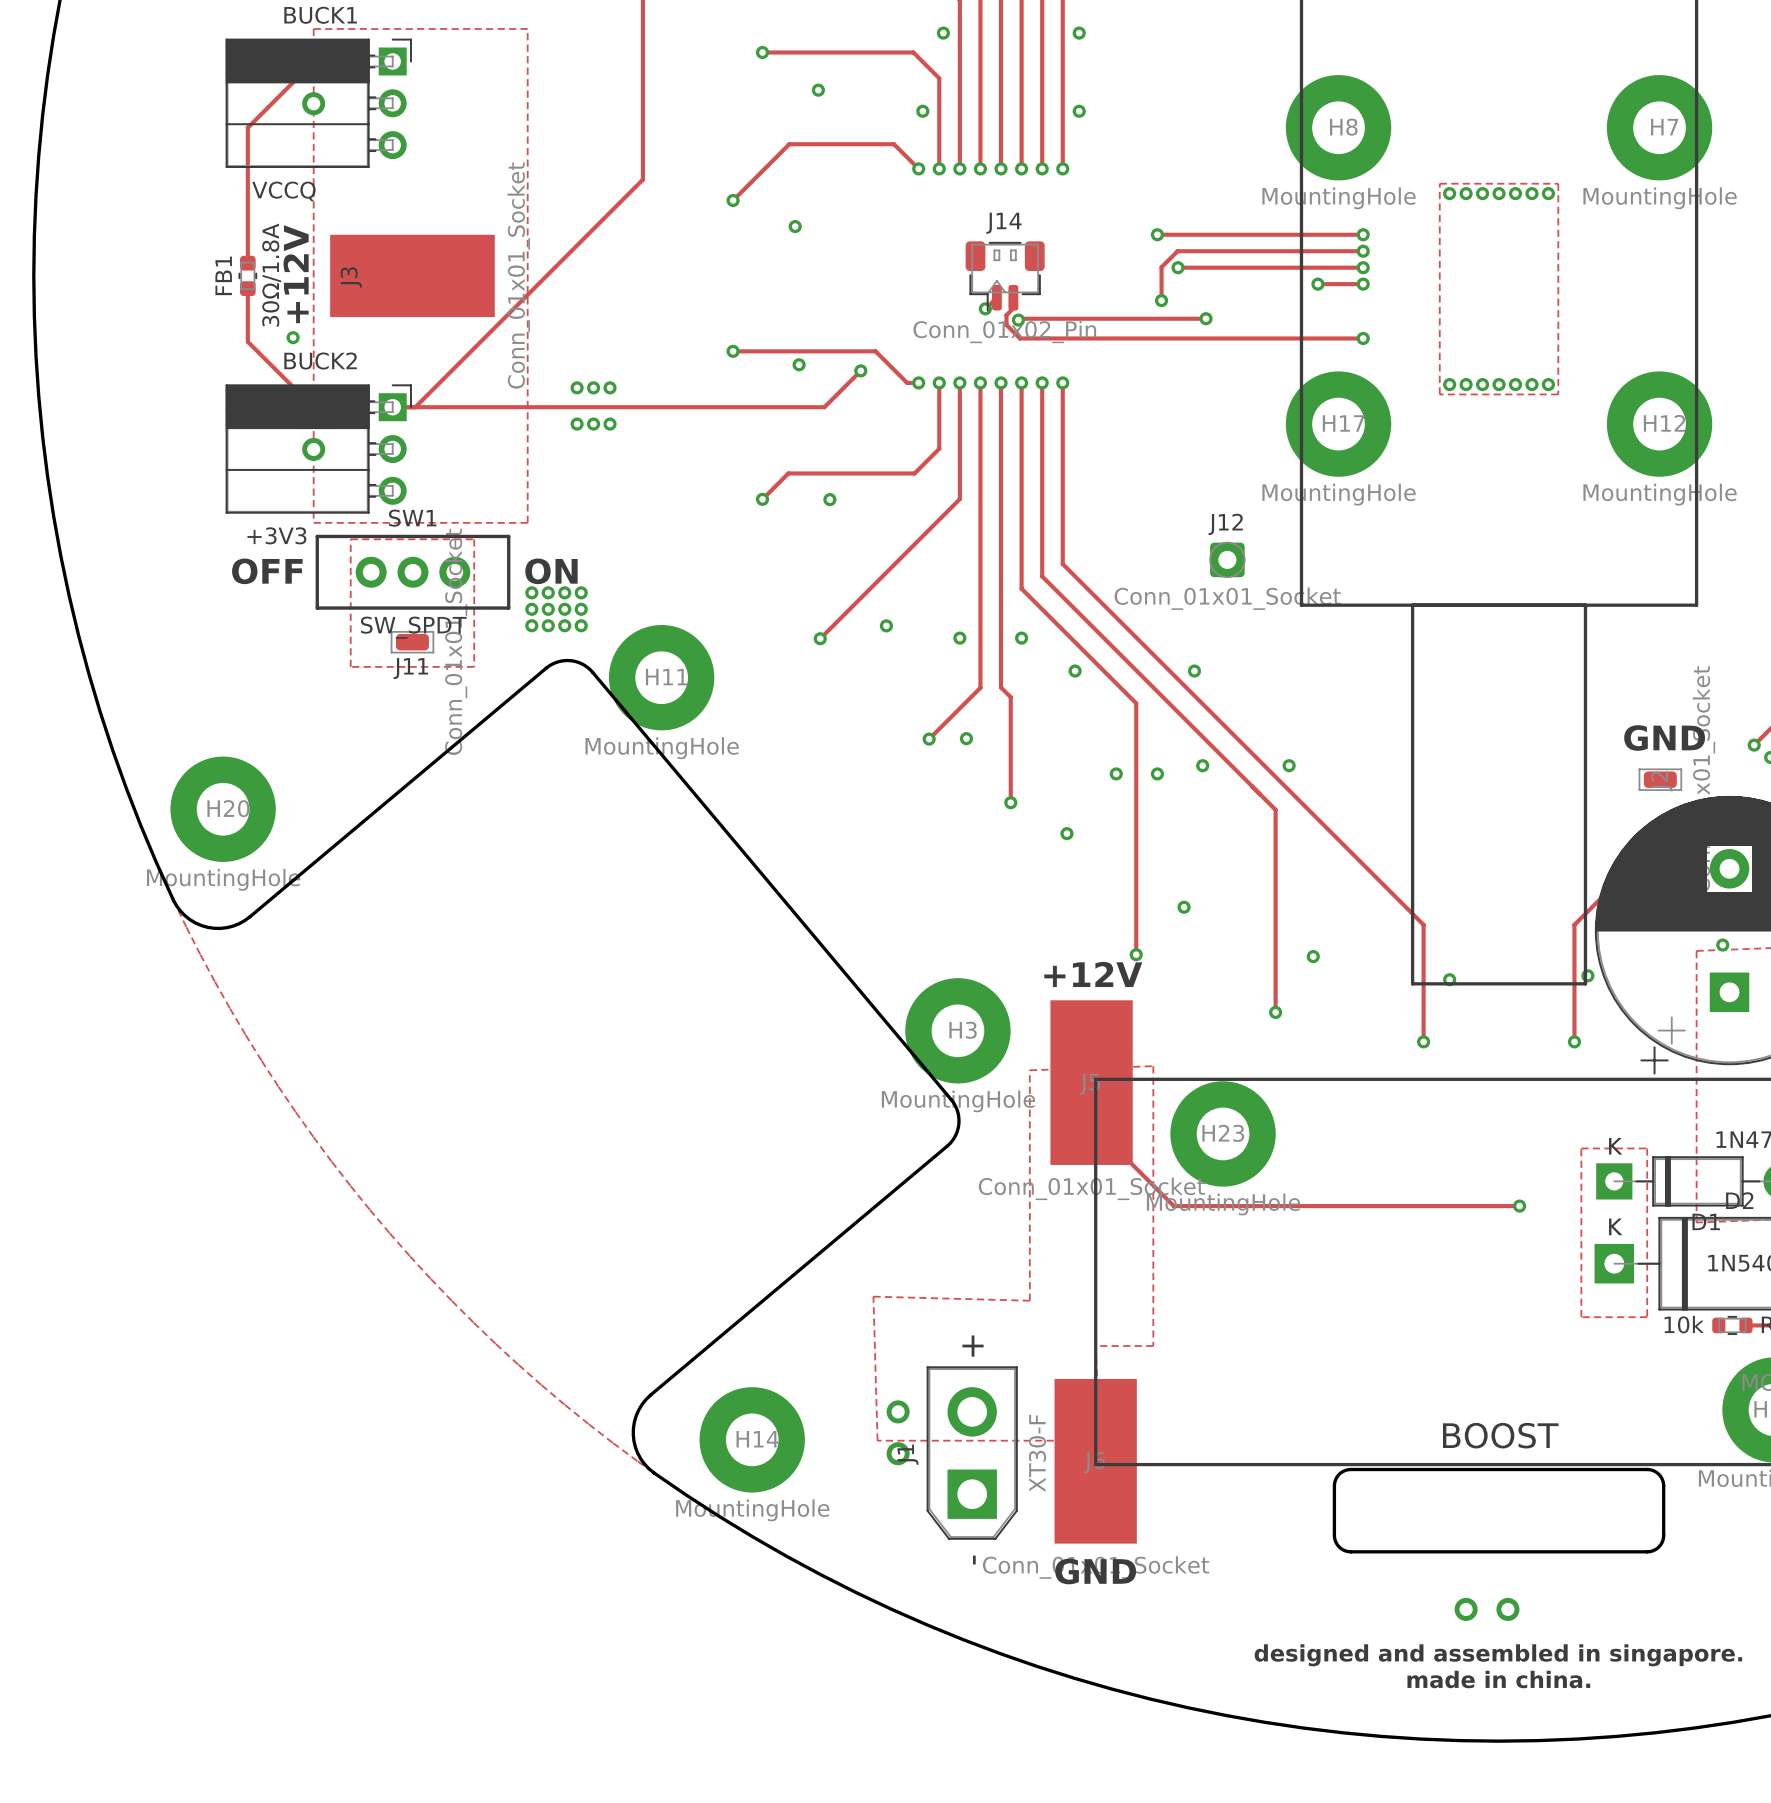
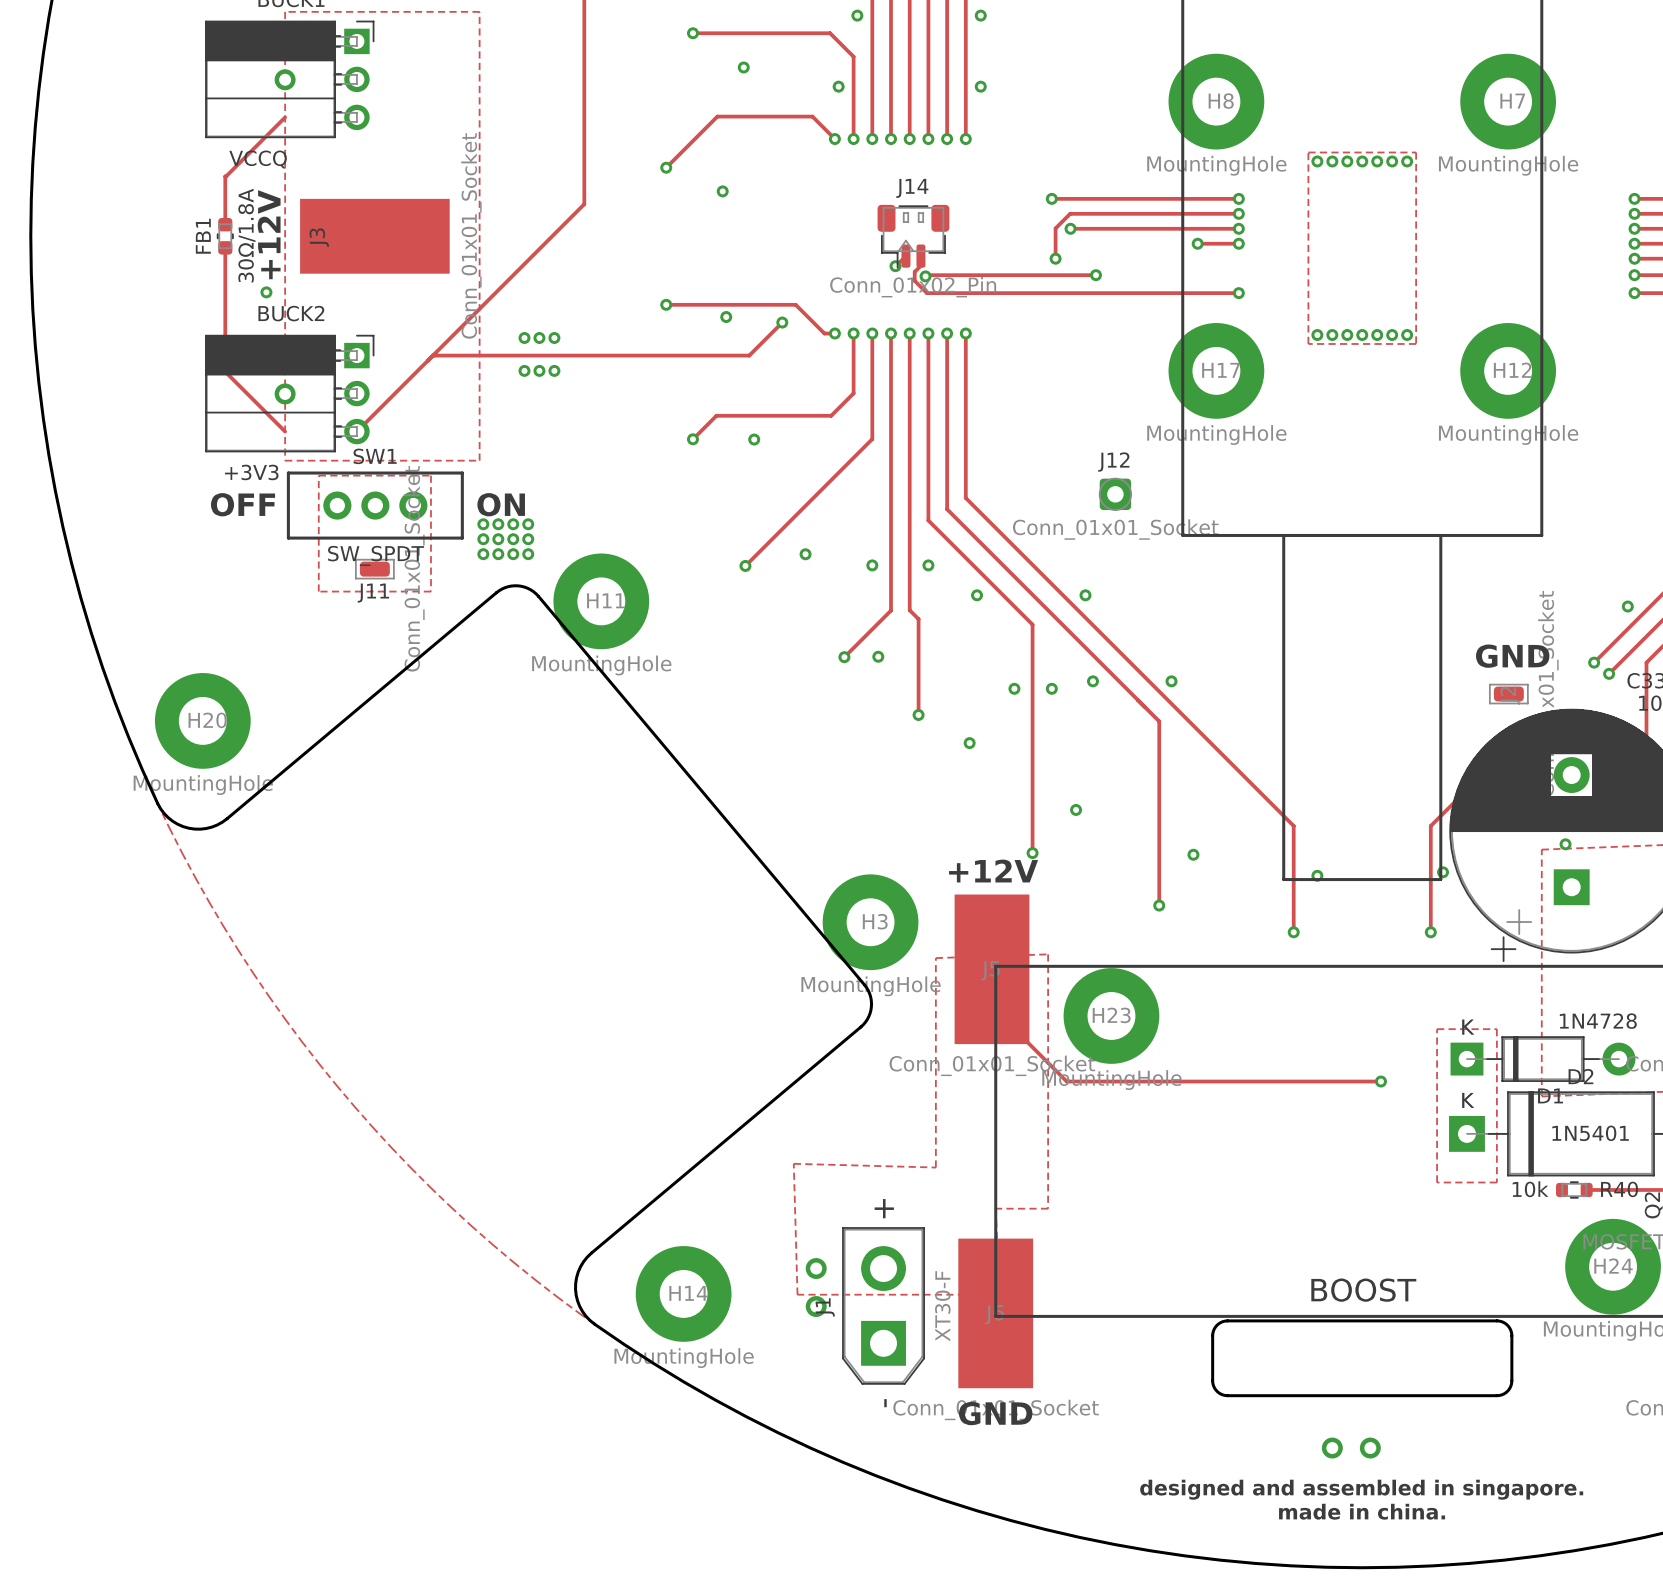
track: (313, 61) (247, 127) (247, 210) -> (285, 117) (225, 176)
track: (642, 179) (415, 407) -> (584, 148) (584, 204) (356, 431)
track: (247, 341) (313, 407) -> (225, 296) (225, 371) (285, 431)
track: (392, 407) (476, 407) -> none

